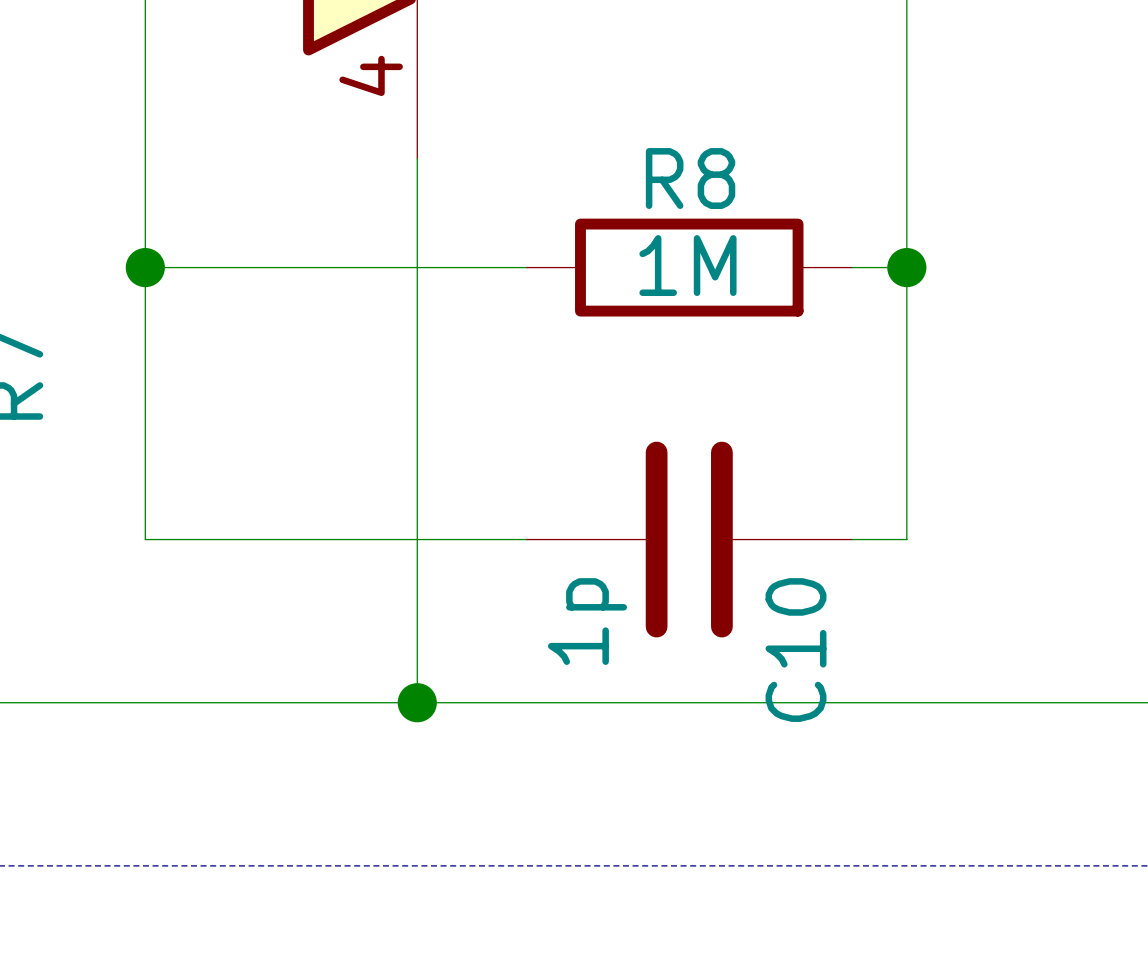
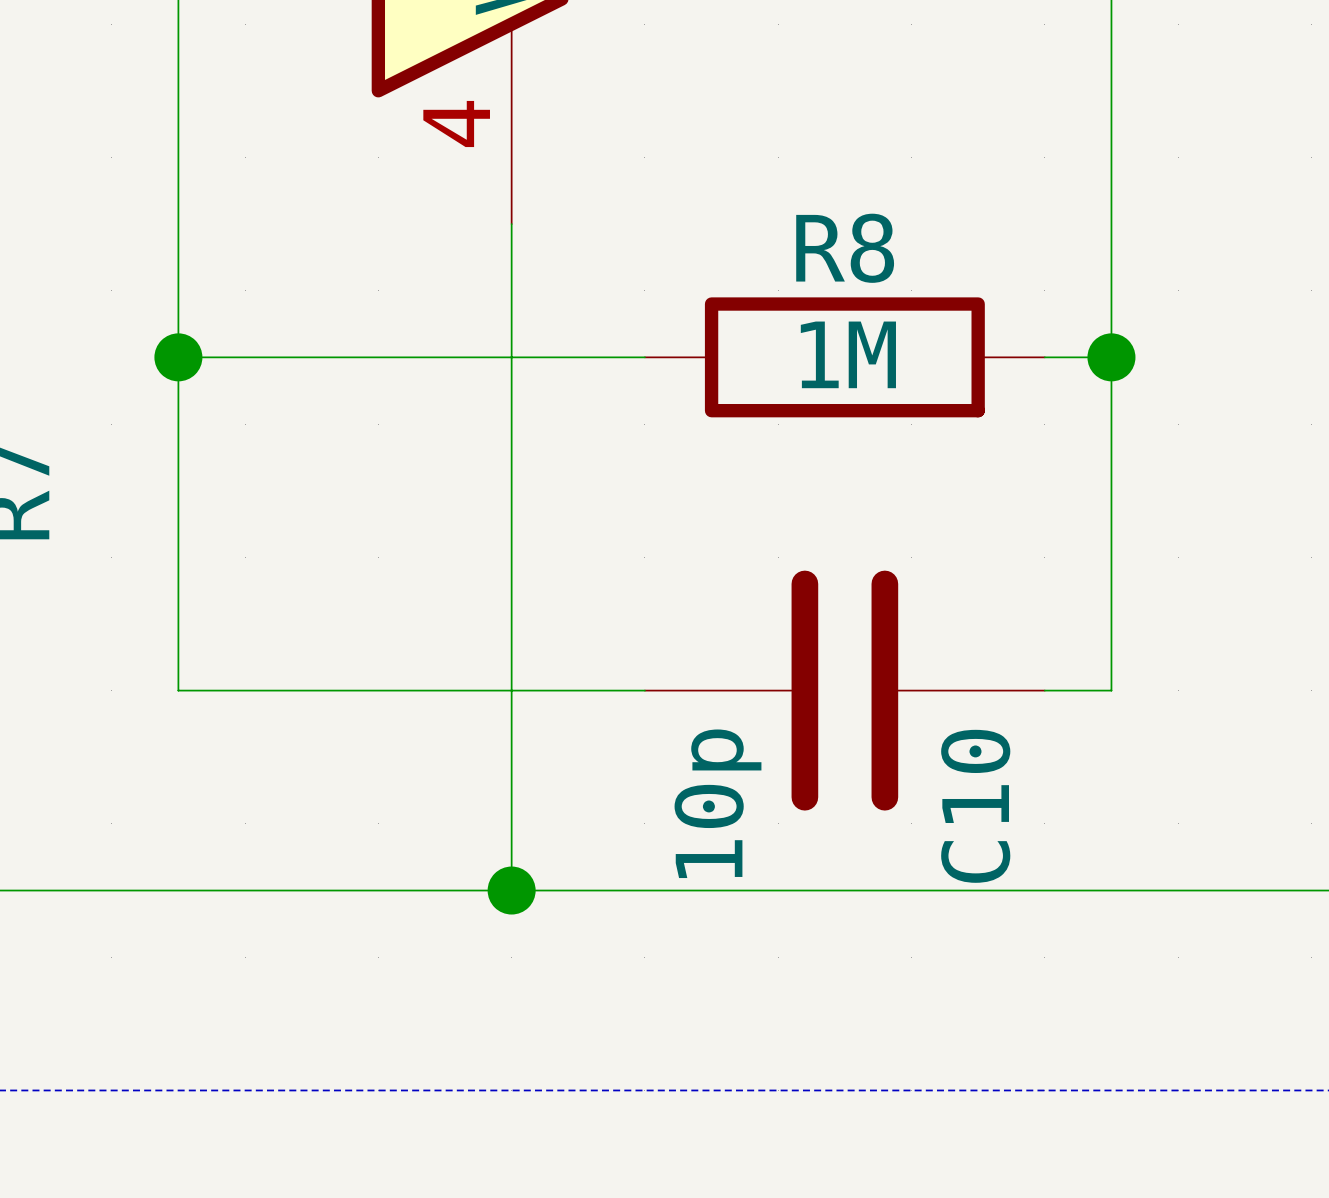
C10 value: 1p (587, 621) -> 10p (717, 803)

